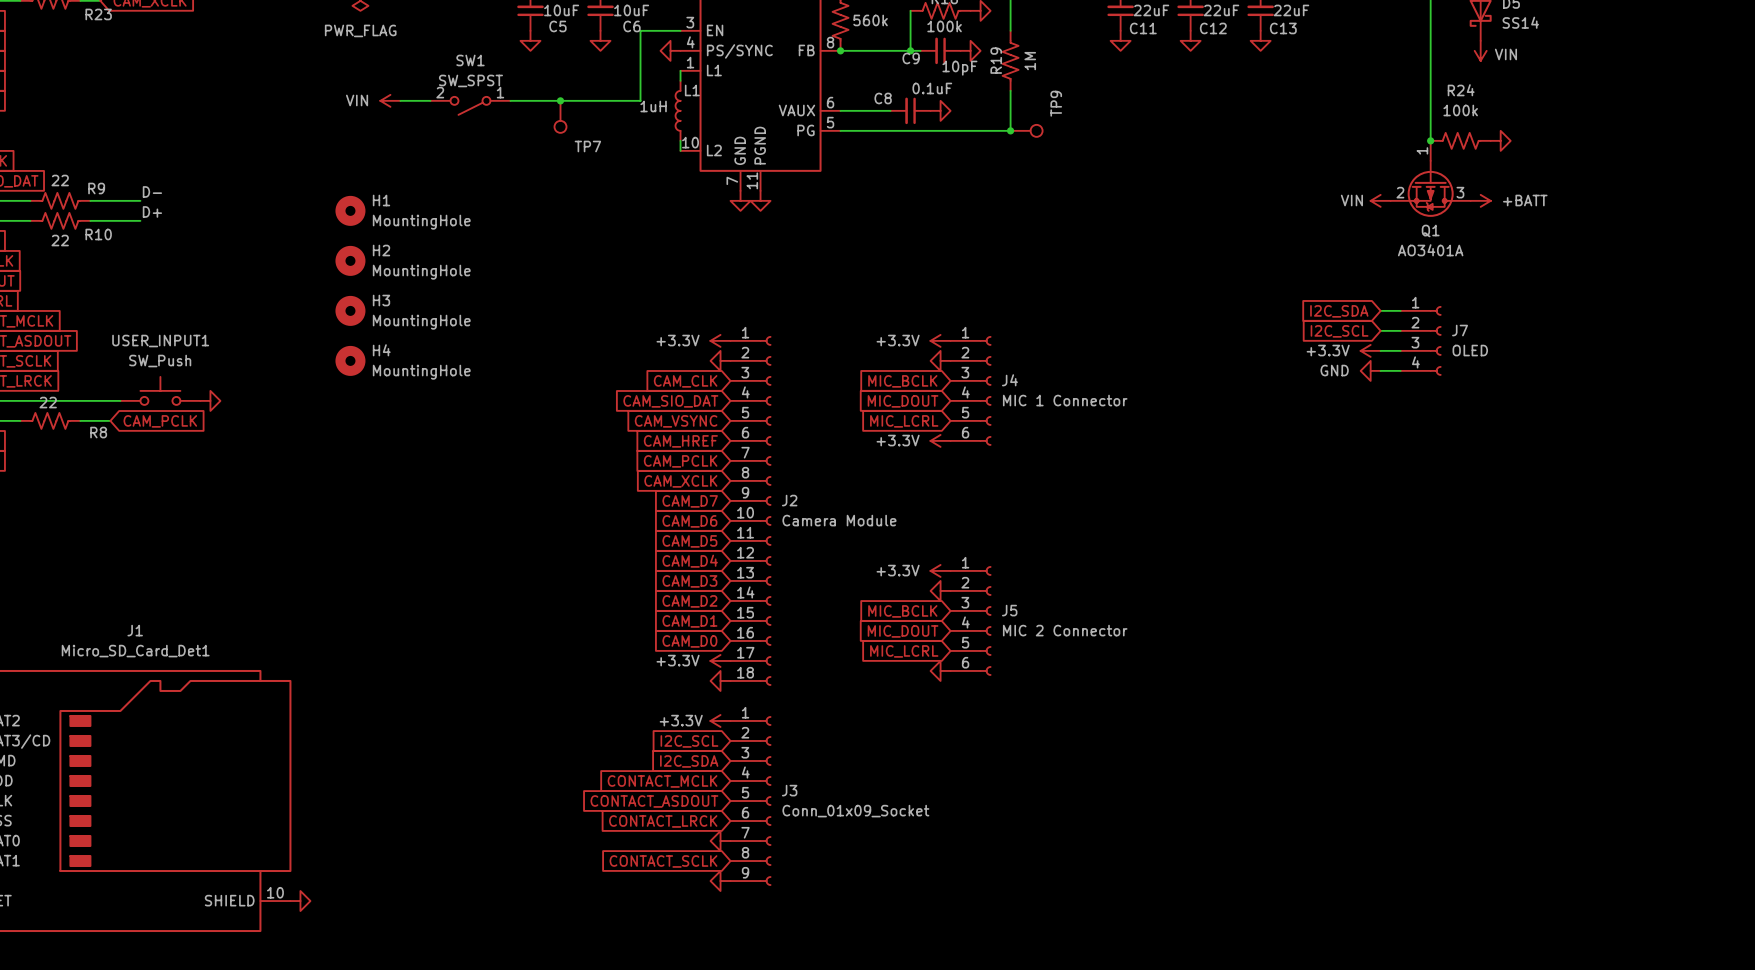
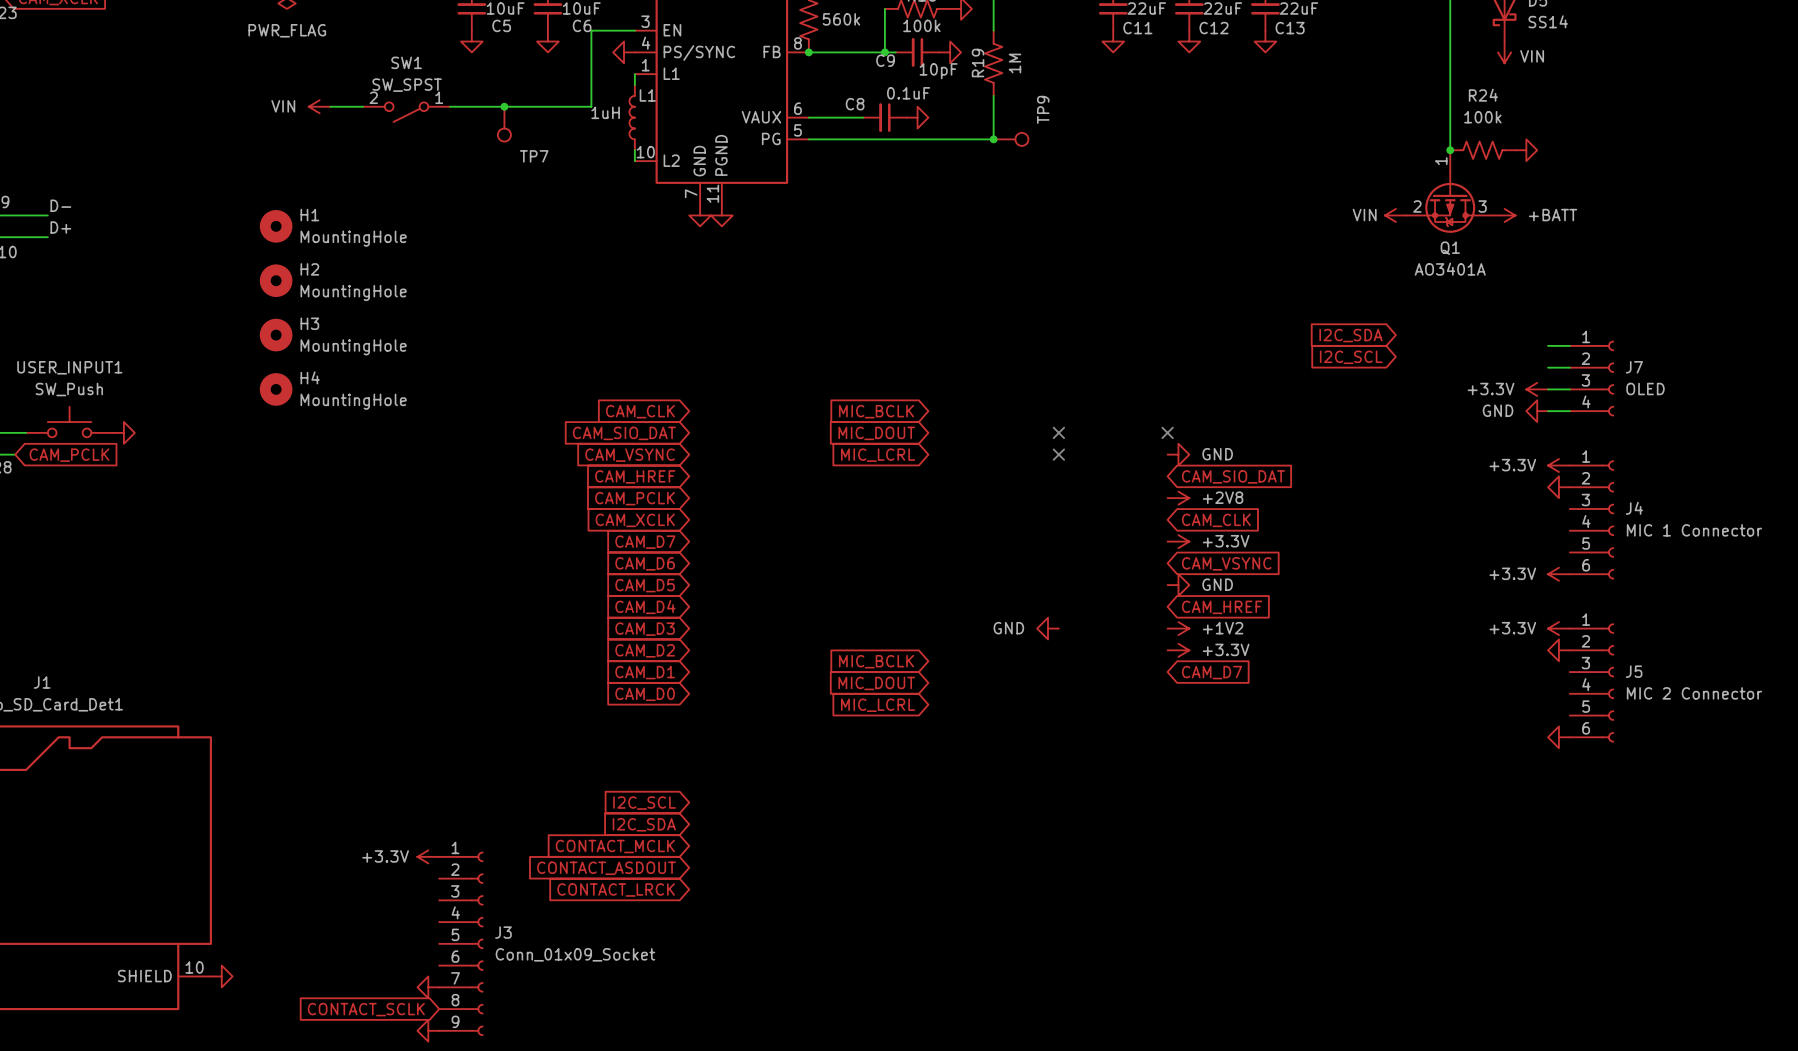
wire: (1380, 310) (1400, 310) -> (1548, 345) (1569, 345)
wire: (1380, 330) (1400, 330) -> (1548, 367) (1569, 367)
power symbol: +3.3V (720, 340) -> none
power symbol: +3.3V (940, 340) -> none
J7 position: (1420, 340) -> (1591, 378)
power symbol: +3.3V (1370, 350) -> none
wire: (1380, 350) (1400, 350) -> (1548, 389) (1569, 389)
power symbol: (720, 360) -> none
power symbol: (940, 360) -> none
power symbol: none -> +3.3V (1537, 389)
power symbol: GND (1370, 370) -> none
wire: (1380, 370) (1400, 370) -> (1548, 411) (1569, 411)
power symbol: none -> GND (1537, 411)
J4 position: (970, 390) -> (1591, 519)
no-connect mark: none -> (1058, 432)
no-connect mark: none -> (1167, 432)
no-connect mark: none -> (1058, 454)
power symbol: none -> GND (1178, 454)
power symbol: none -> +3.3V (1558, 465)
power symbol: +3.3V (940, 440) -> none
global label: none -> CAM_SIO_DAT (1233, 476)
power symbol: none -> (1558, 487)
power symbol: none -> +2V8 (1178, 498)
global label: none -> CAM_CLK (1216, 520)
power symbol: none -> +3.3V (1178, 541)
J2: Camera Module (750, 510) -> none
global label: none -> CAM_VSYNC (1226, 563)
power symbol: none -> +3.3V (1558, 574)
power symbol: none -> GND (1178, 585)
global label: none -> CAM_HREF (1222, 607)
power symbol: +3.3V (940, 570) -> none
power symbol: none -> GND (1048, 628)
power symbol: none -> +1V2 (1178, 628)
power symbol: none -> +3.3V (1558, 628)
power symbol: (940, 590) -> none
power symbol: none -> +3.3V (1178, 650)
power symbol: none -> (1558, 650)
J5 position: (970, 620) -> (1591, 682)
global label: none -> CAM_D7 (1212, 672)
power symbol: +3.3V (720, 660) -> none
power symbol: (940, 670) -> none
power symbol: (720, 680) -> none
power symbol: none -> (1558, 737)
power symbol: +3.3V (720, 720) -> none
power symbol: none -> +3.3V (428, 856)
J3 position: (750, 800) -> (461, 943)
power symbol: (720, 841) -> none
global label: CONTACT_SCLK (663, 861) -> none
power symbol: (720, 881) -> none
power symbol: none -> (428, 987)
global label: none -> CONTACT_SCLK (366, 1009)
power symbol: none -> (428, 1030)

